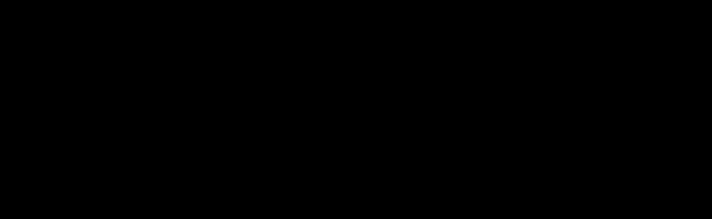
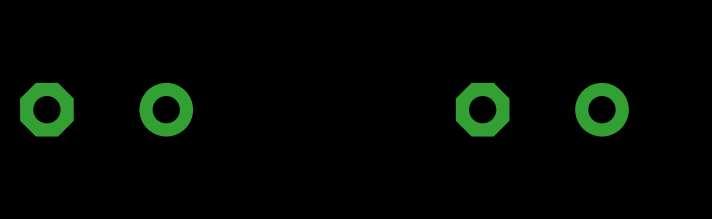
part: none -> (106, 109)
part: none -> (542, 109)

